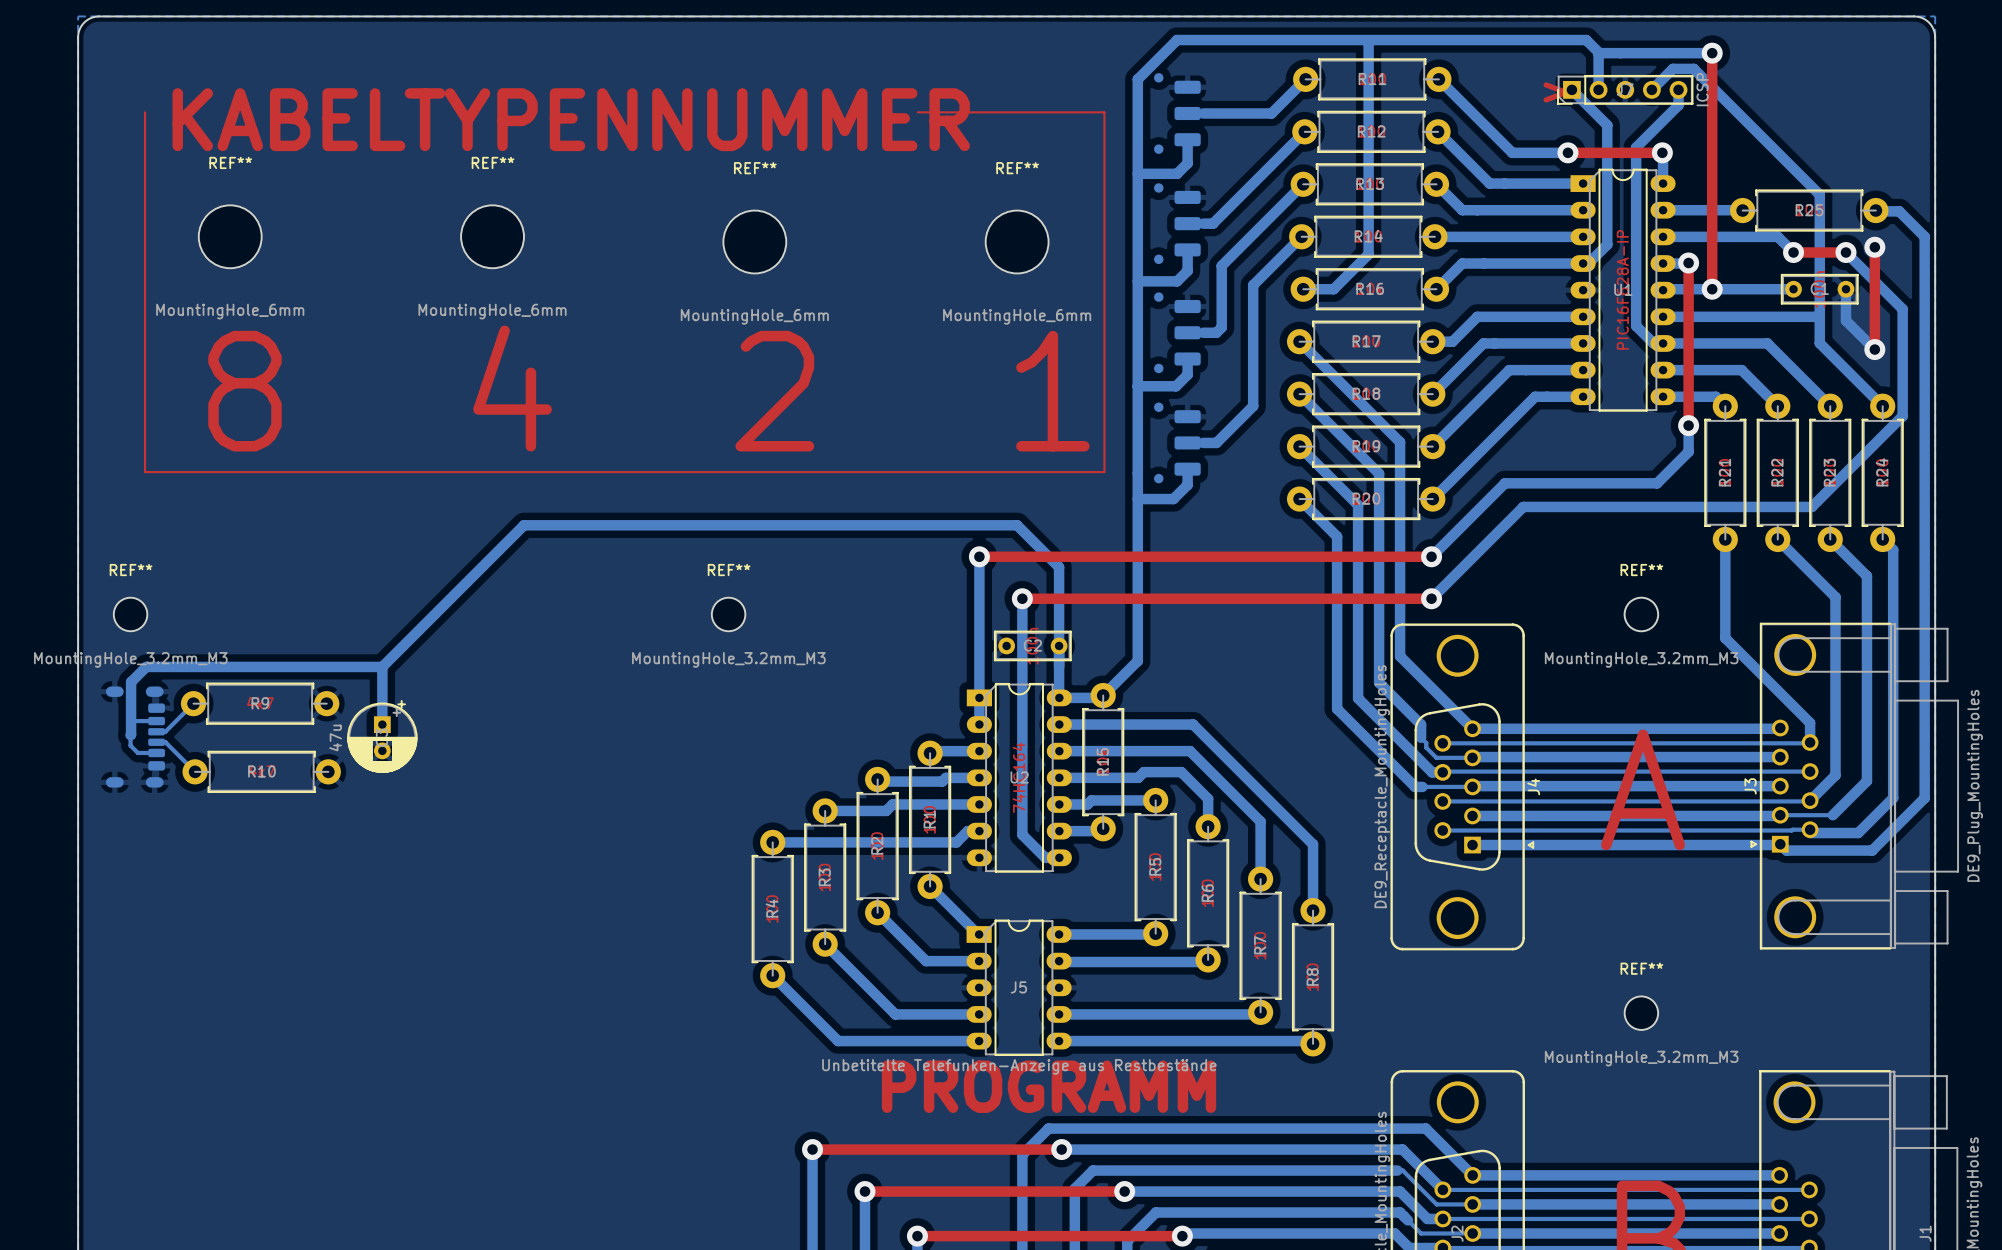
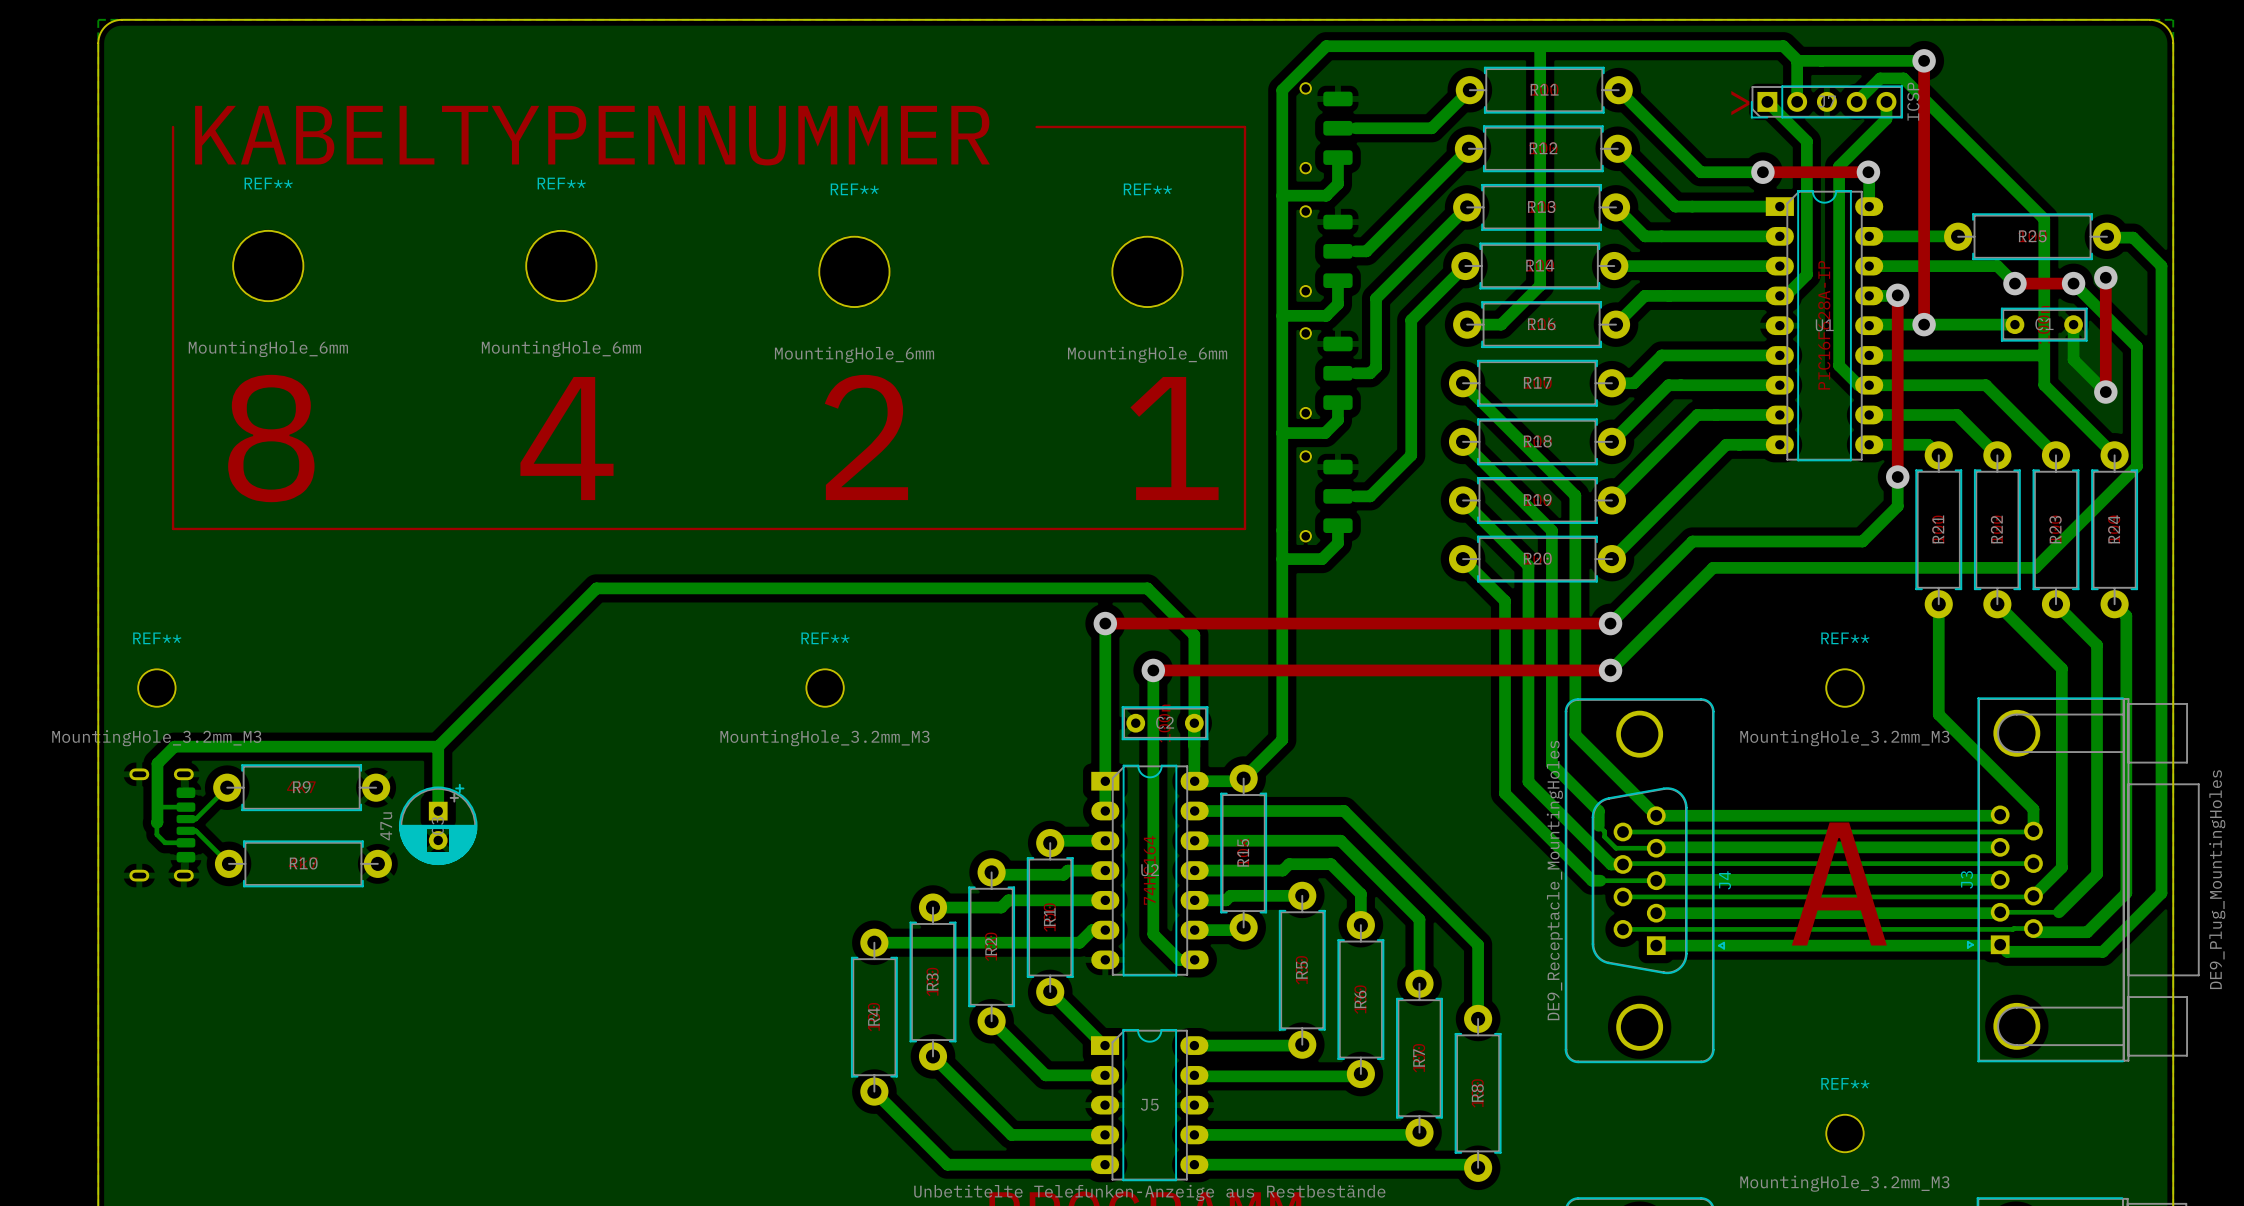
part footprint: [1154, 73, 1201, 154] -> [1300, 83, 1353, 174]
part footprint: [1154, 183, 1201, 265] -> [1300, 206, 1353, 297]
part footprint: [1154, 292, 1201, 374] -> [1300, 328, 1353, 419]
part footprint: [1154, 402, 1201, 484] -> [1300, 451, 1353, 542]
part footprint: [105, 686, 165, 788] -> [129, 768, 196, 882]

